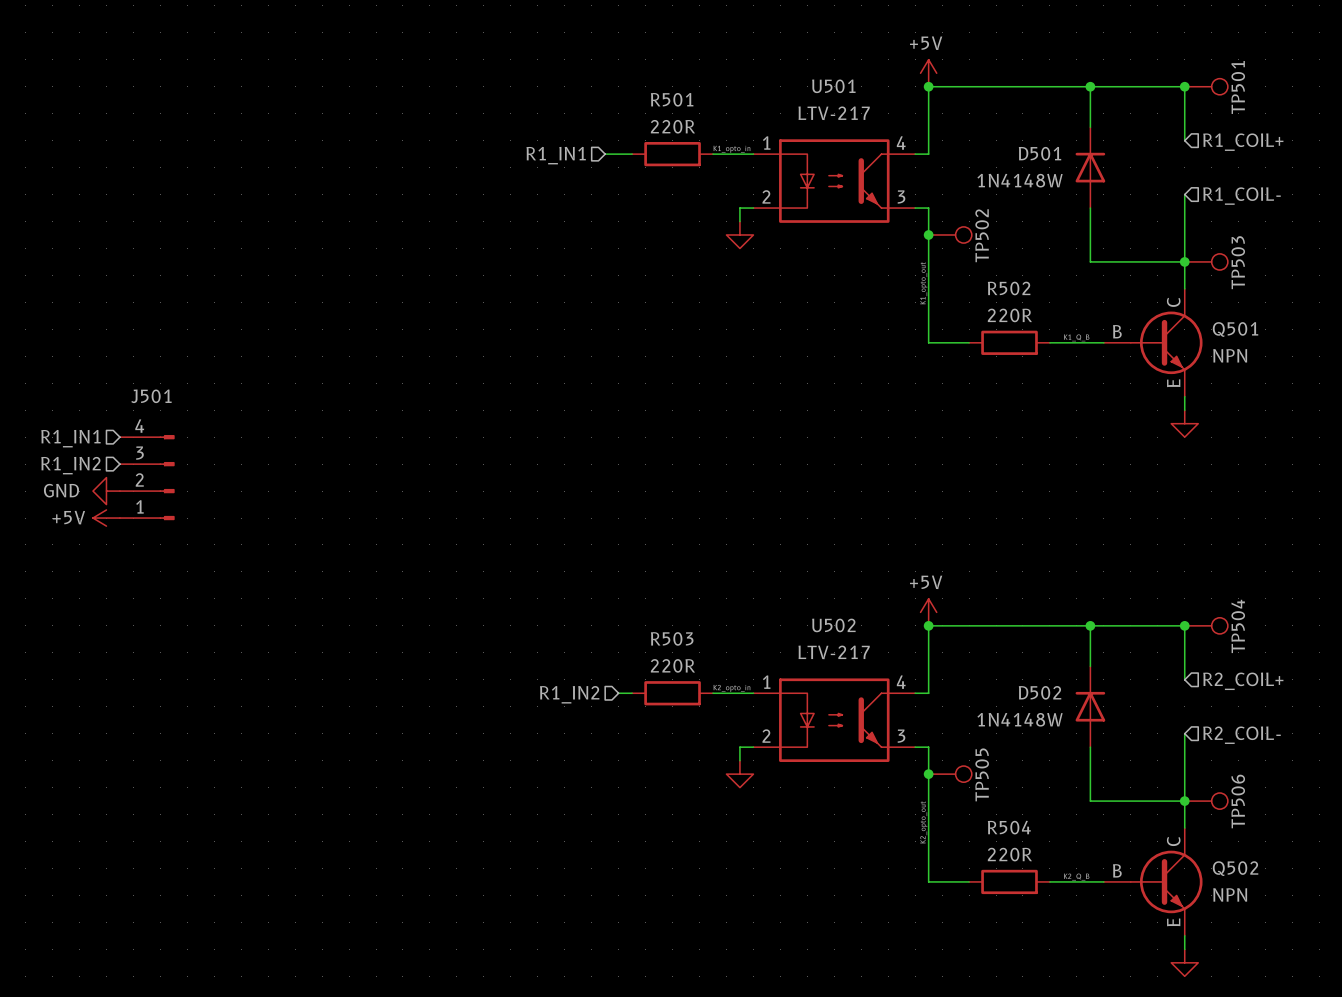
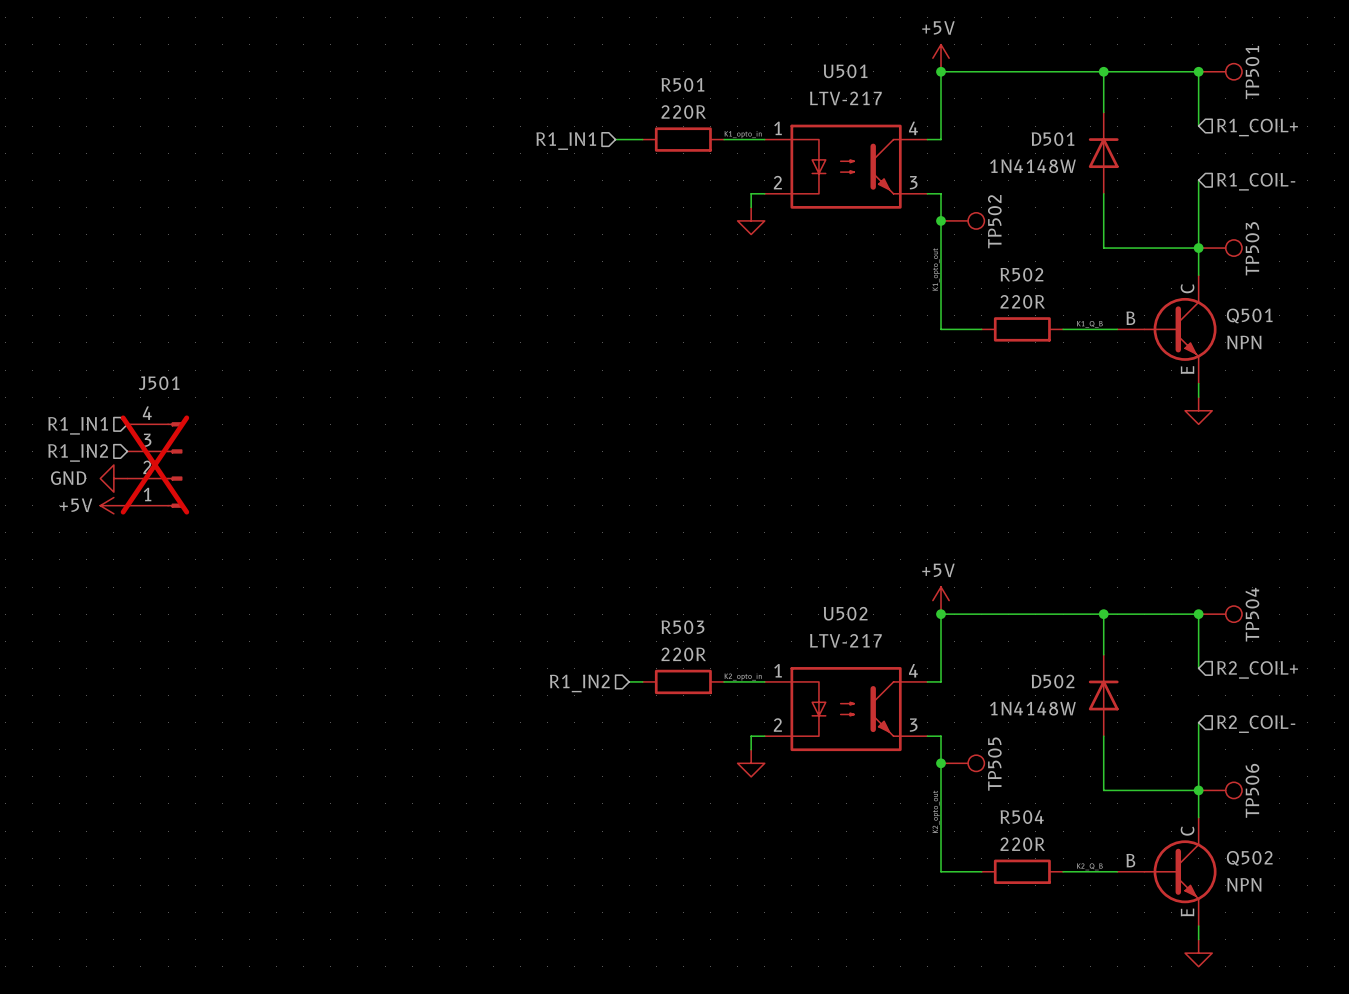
J501 do-not-place cross: none -> (154, 465)

